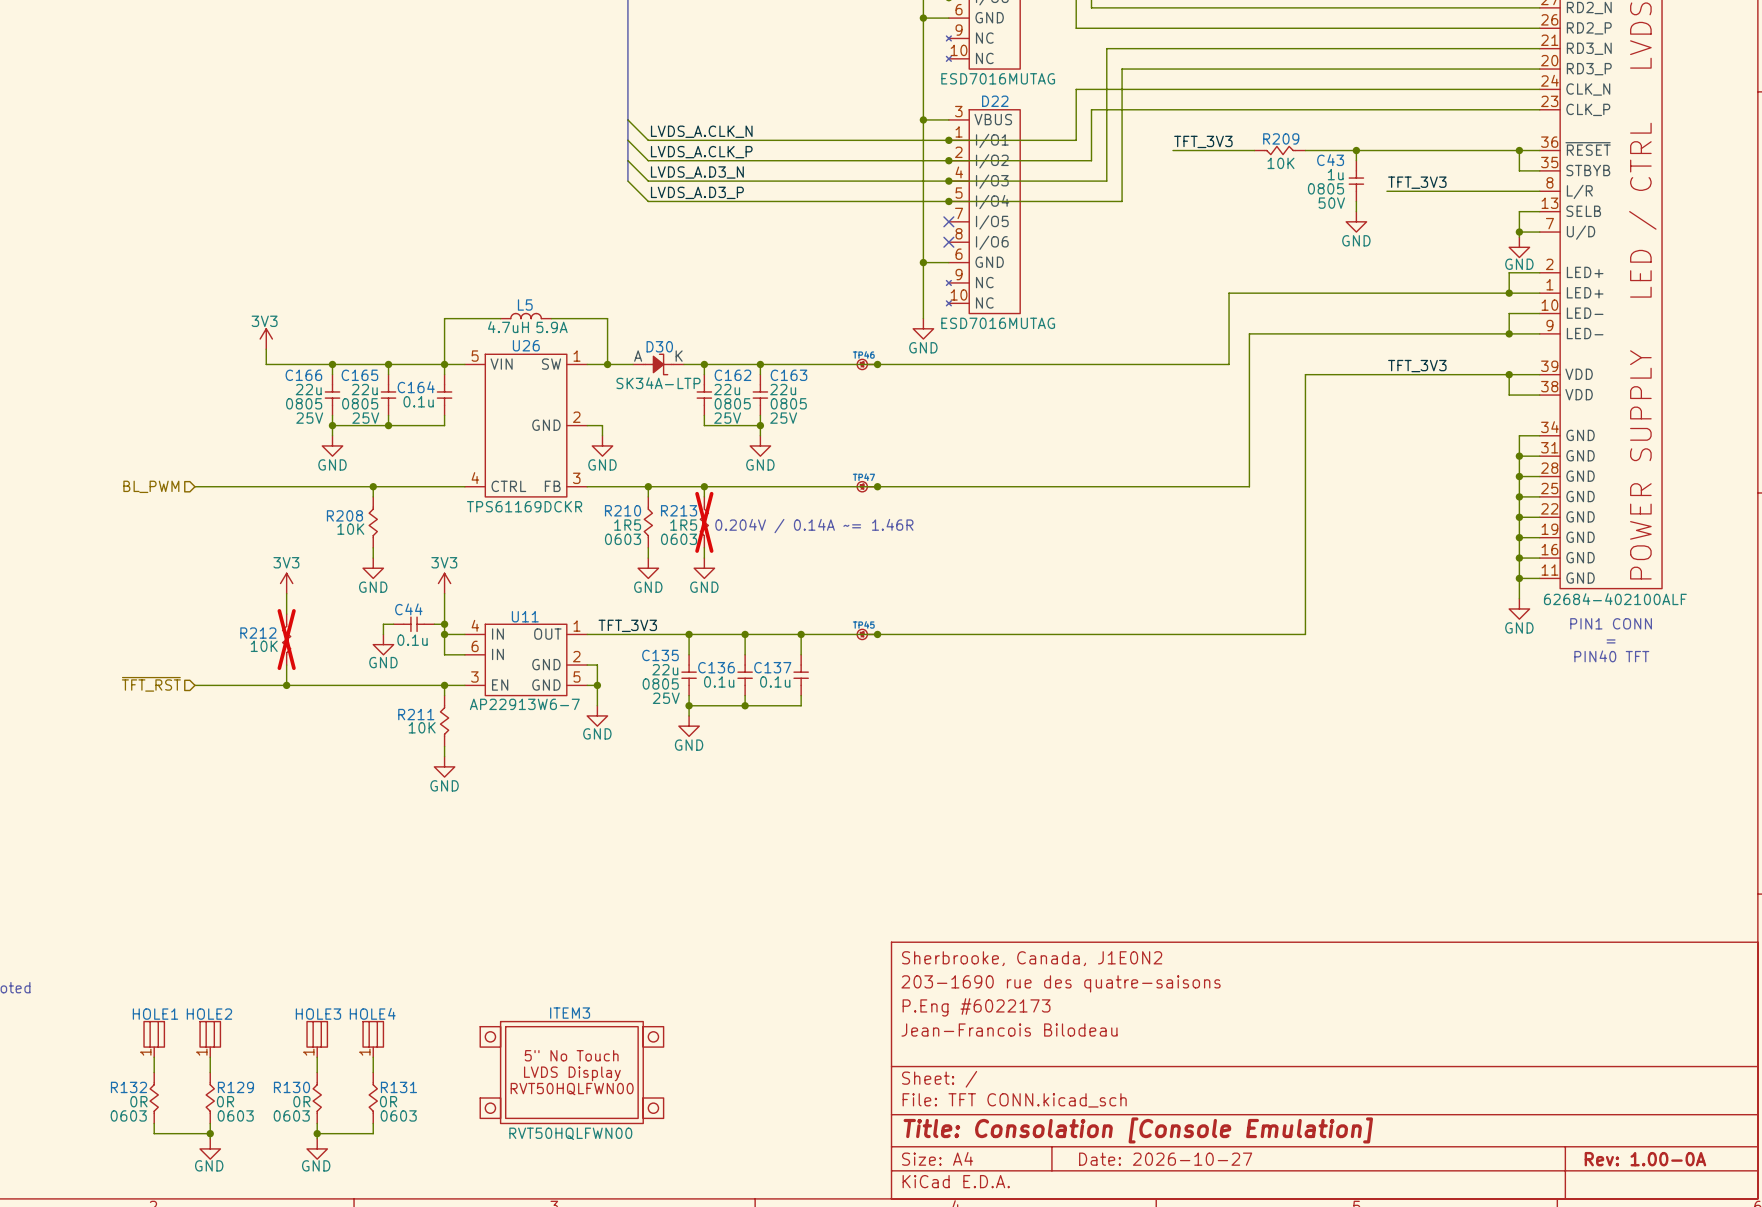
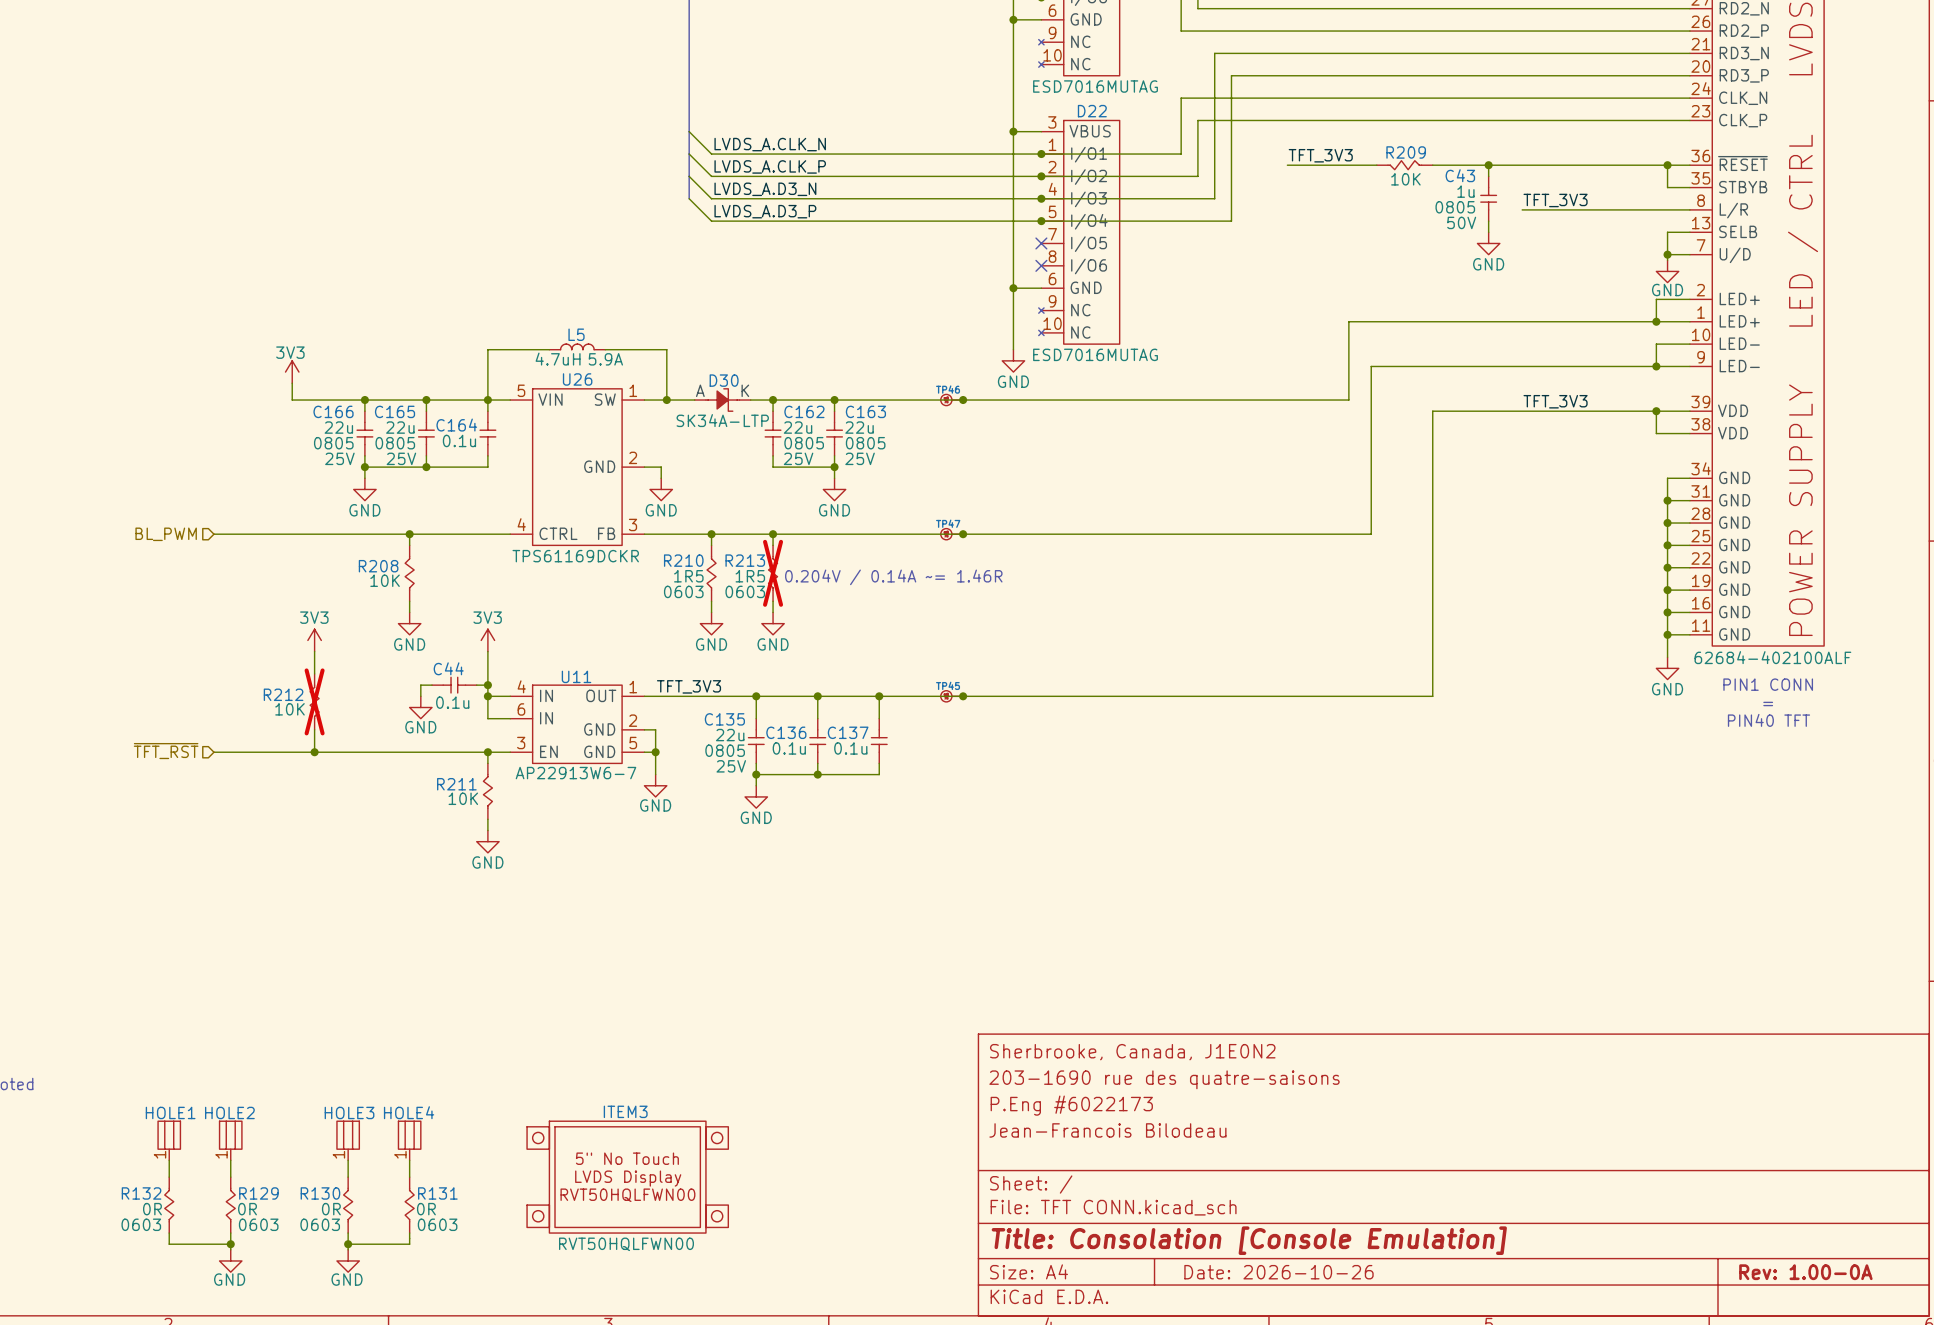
title block: Date: 2026-10-27 (1165, 1159) -> Date: 2026-10-26 (1278, 1272)

